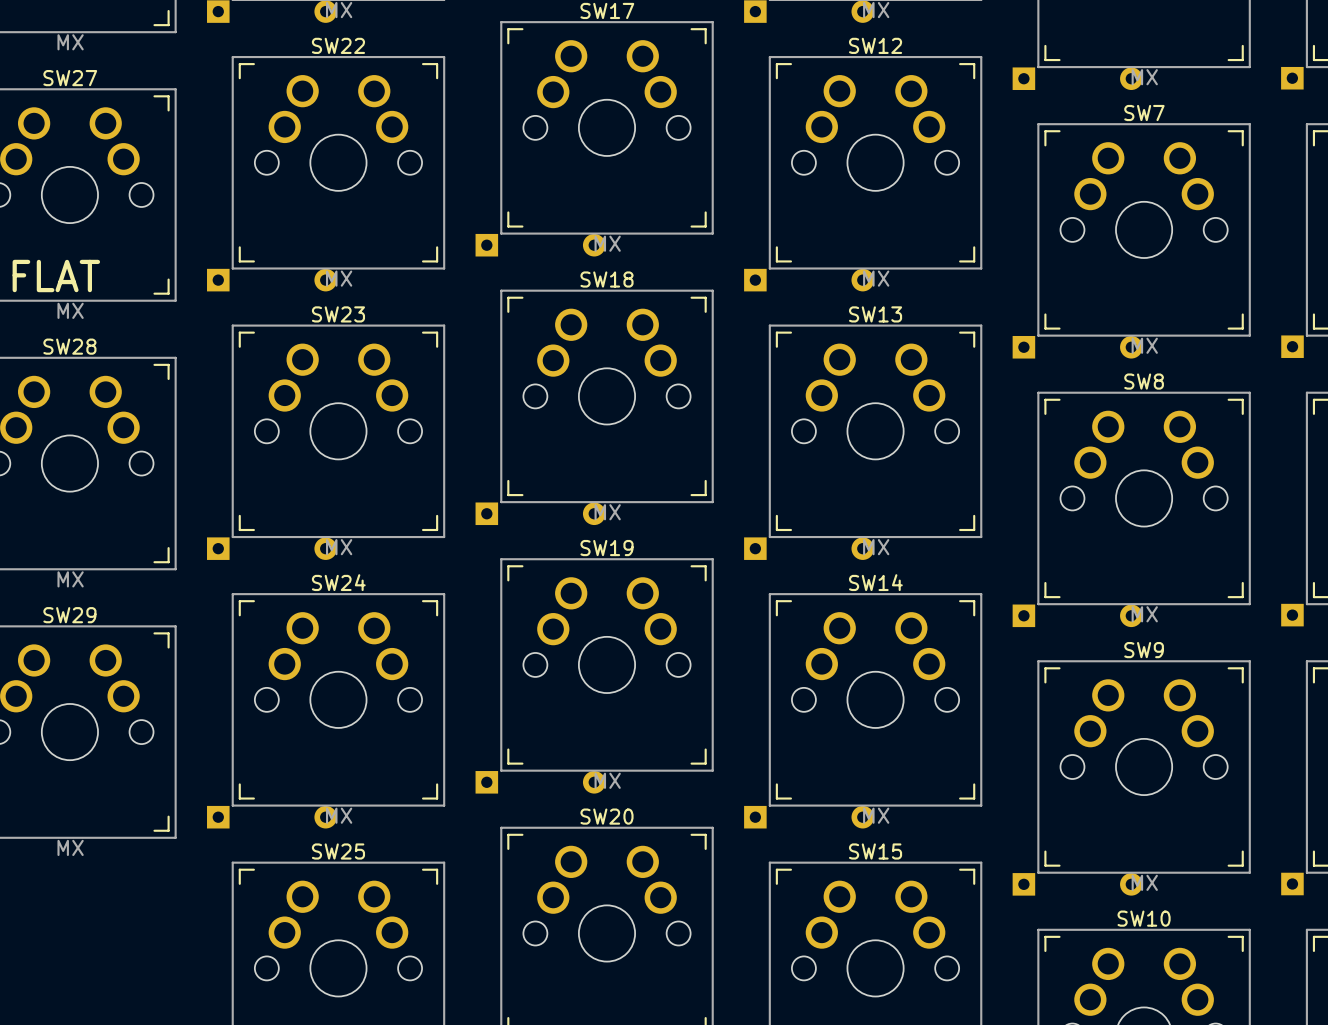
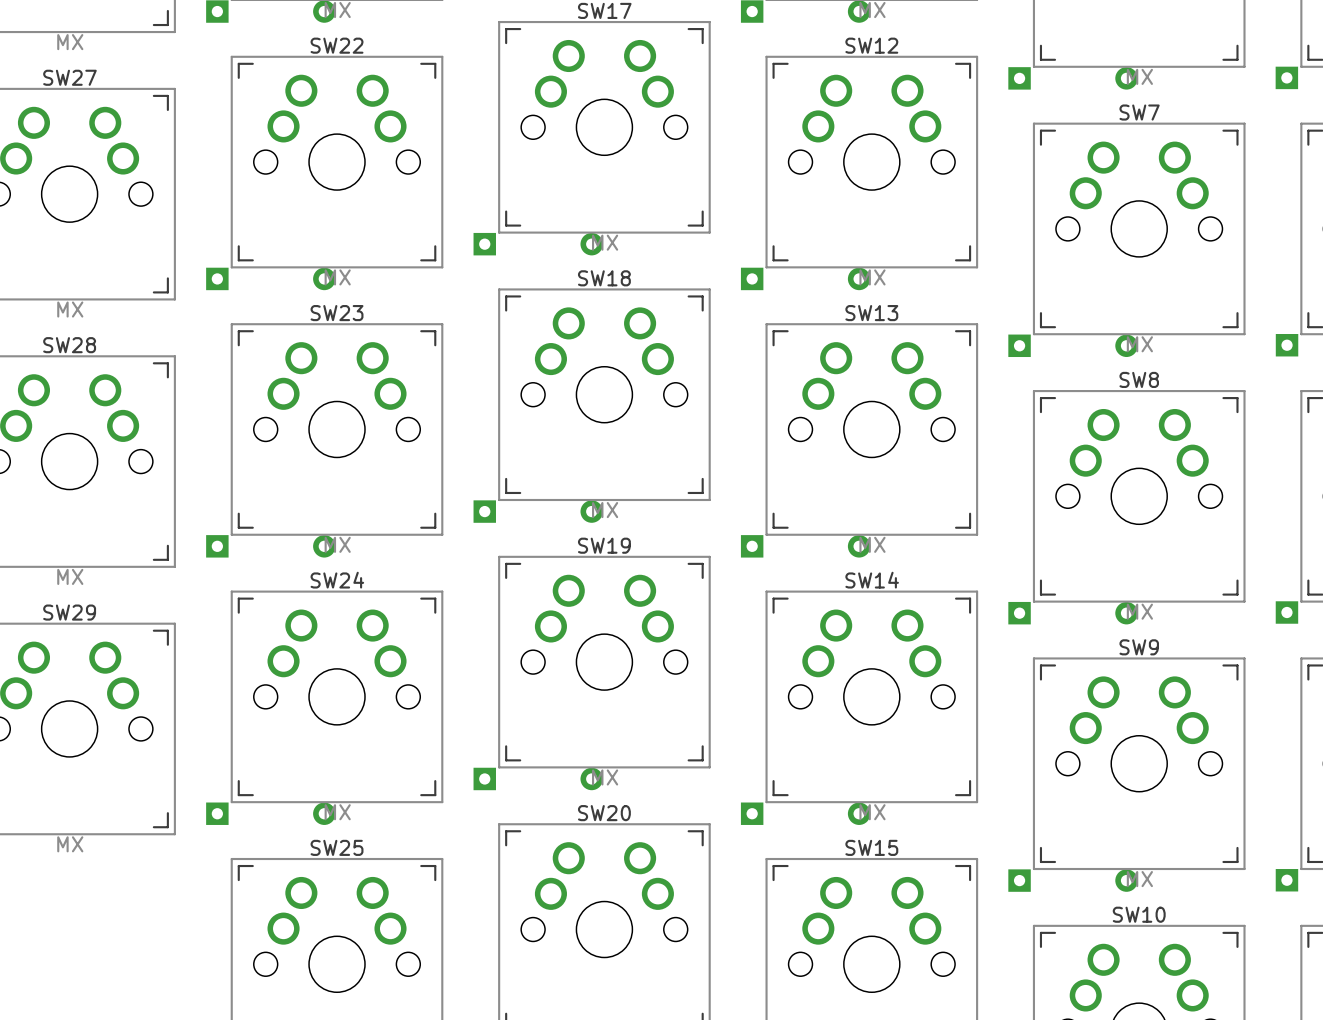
text: FLAT (56, 276) -> none

